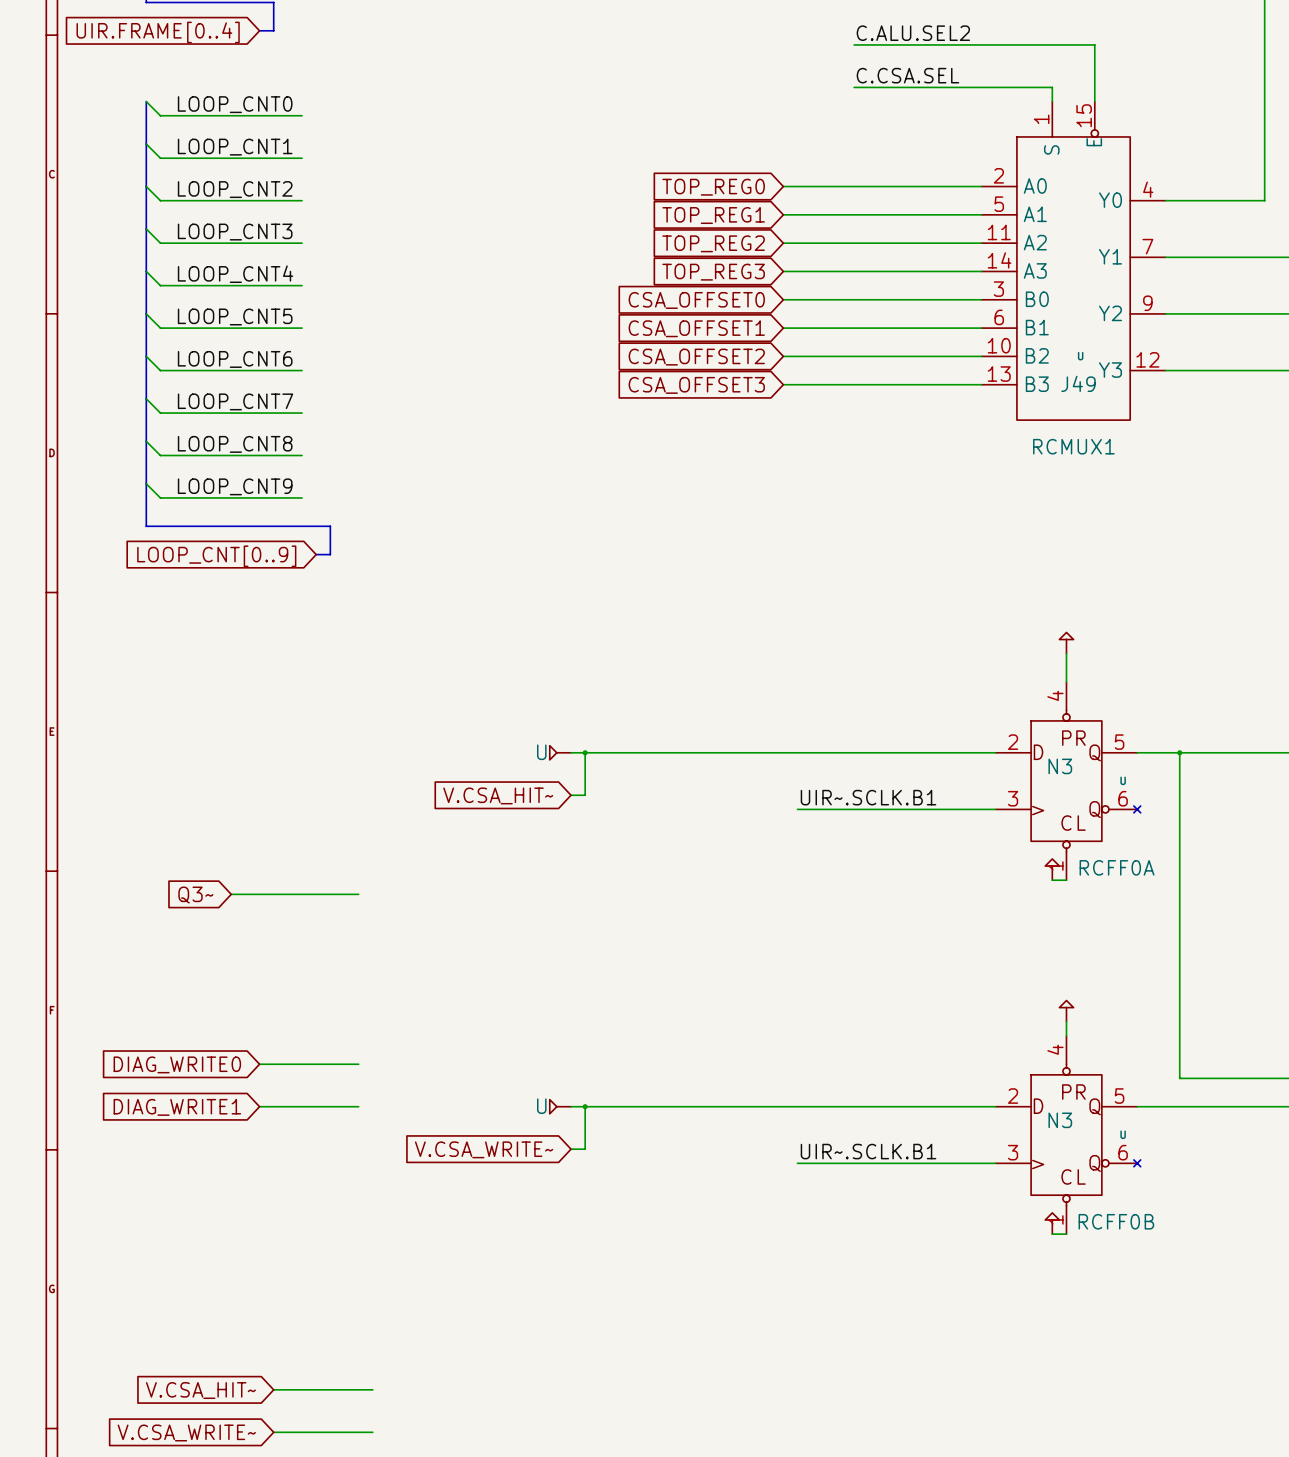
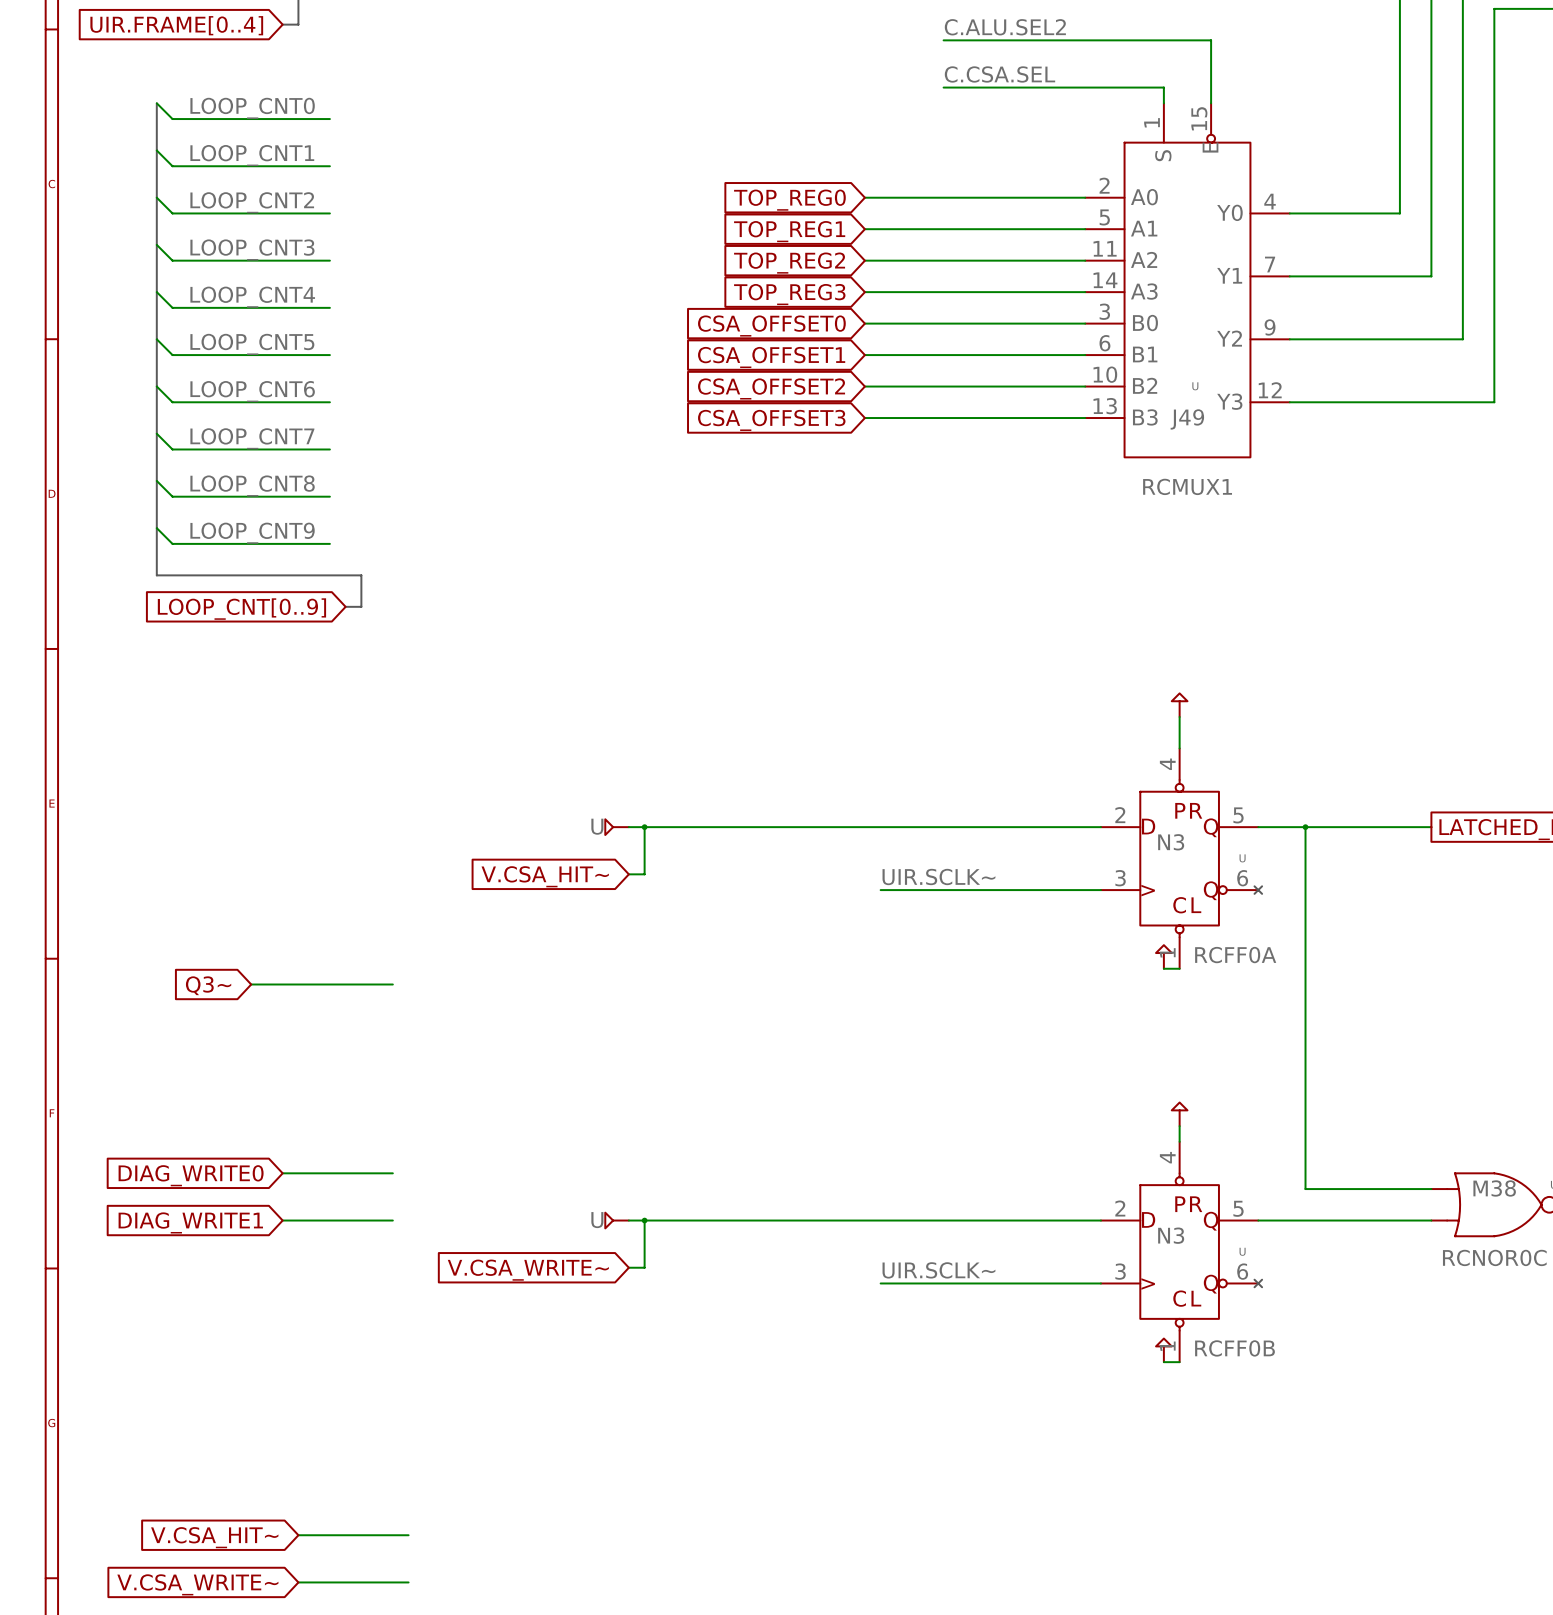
label: UIR~.SCLK.B1 (868, 797) -> UIR.SCLK~ (938, 876)
label: UIR~.SCLK.B1 (868, 1151) -> UIR.SCLK~ (938, 1270)

